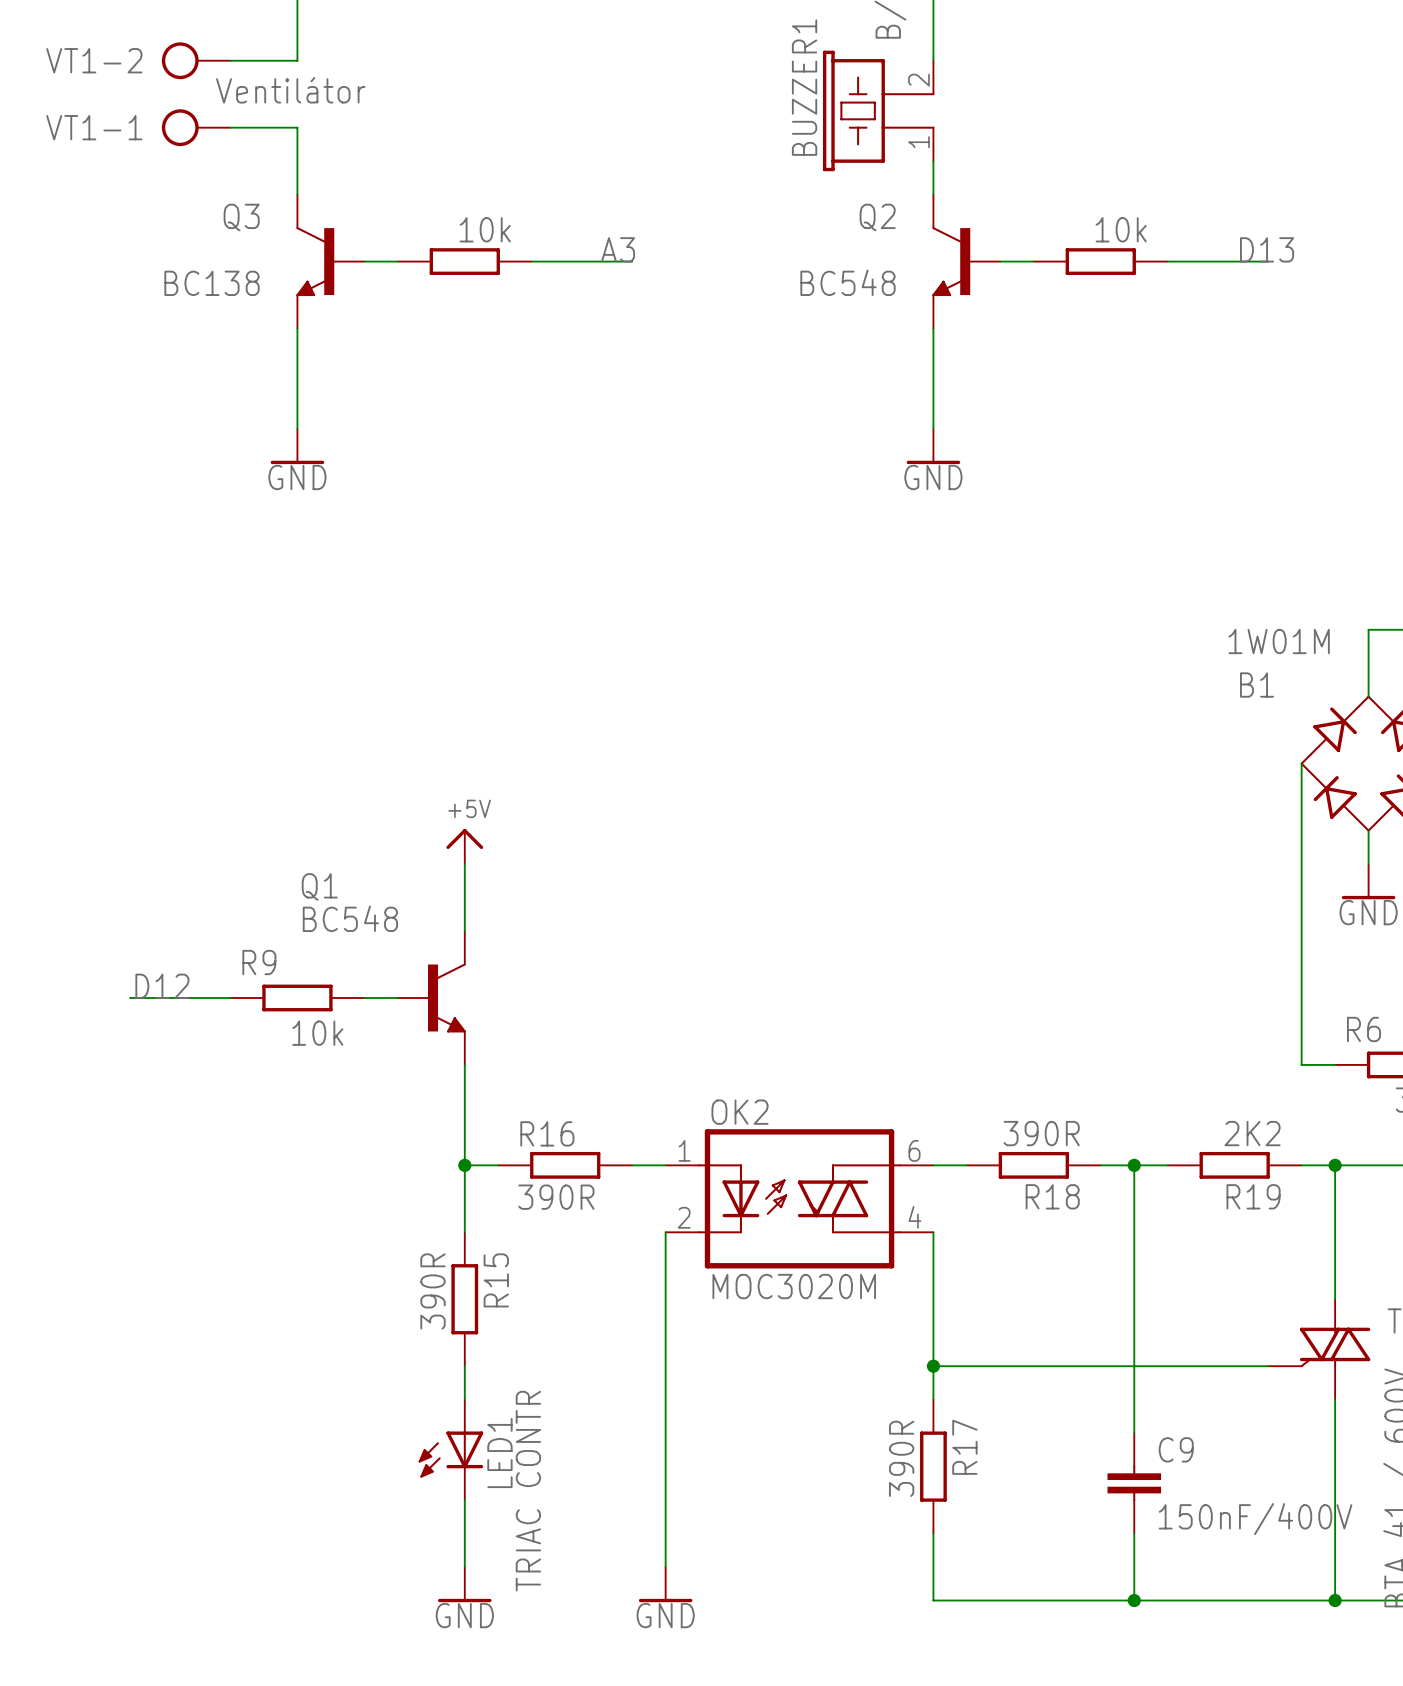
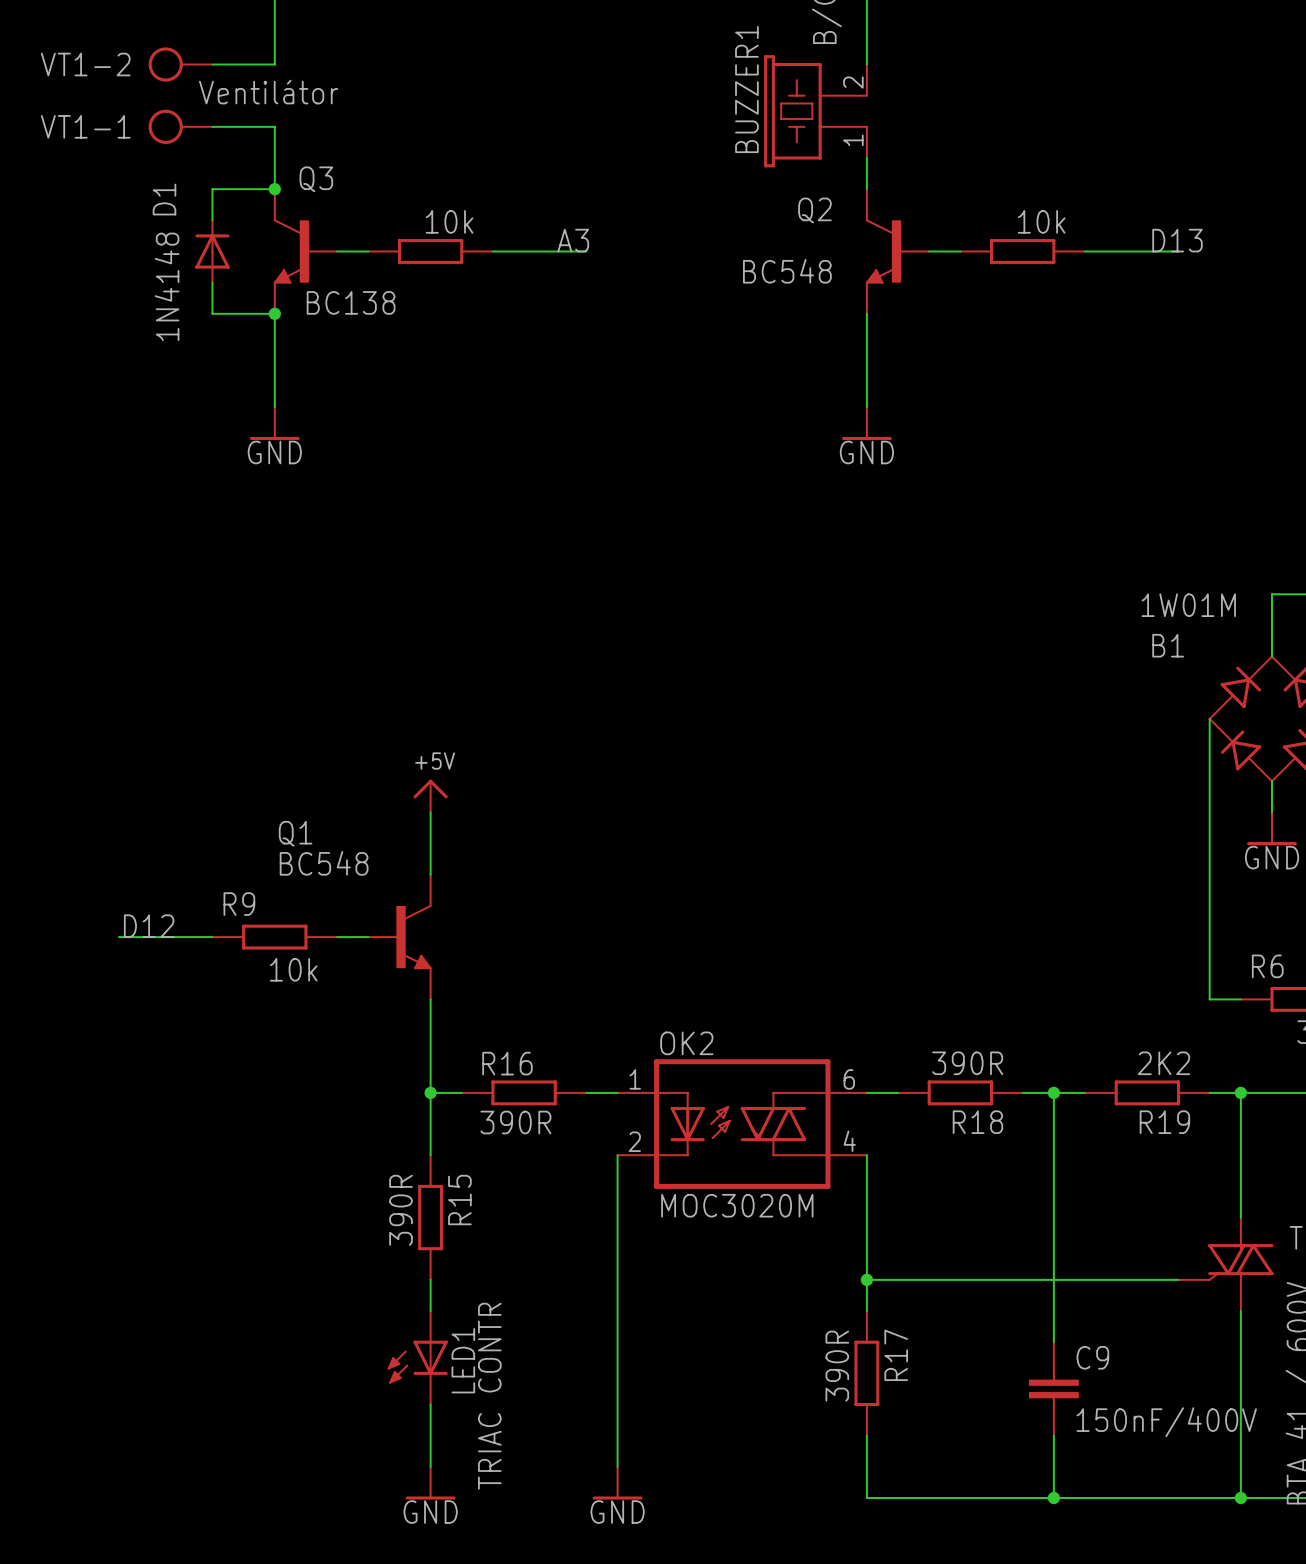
wire: none -> (274, 189) (212, 189) (212, 220)
junction: none -> (274, 189)
Q3 name position: Q3 (241, 217) -> Q3 (316, 179)
D1: none -> 1N4148 (212, 251)
Q3 value position: BC138 (212, 283) -> BC138 (351, 302)
wire: none -> (212, 282) (212, 313) (274, 313)
junction: none -> (274, 313)

